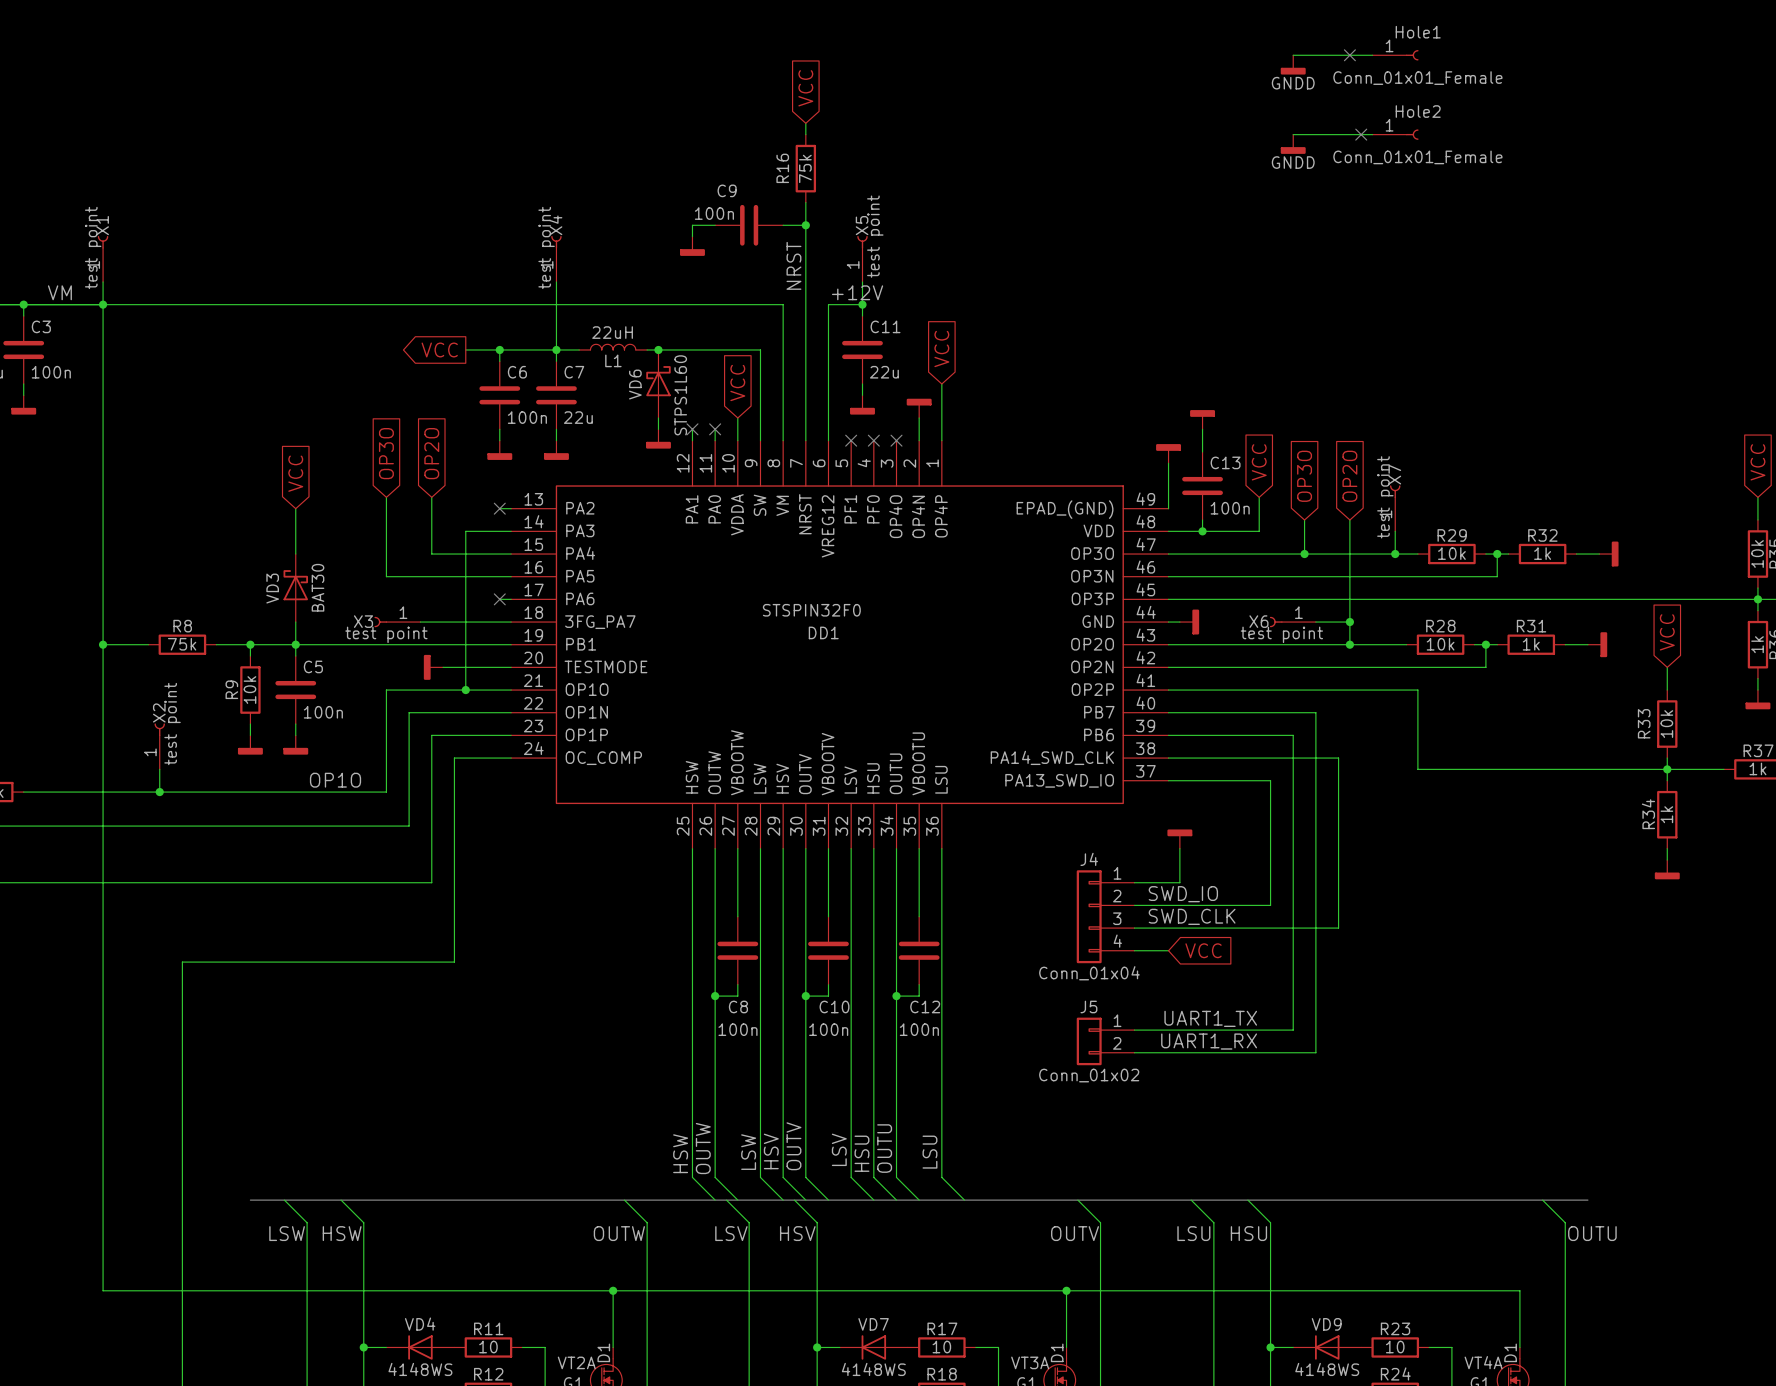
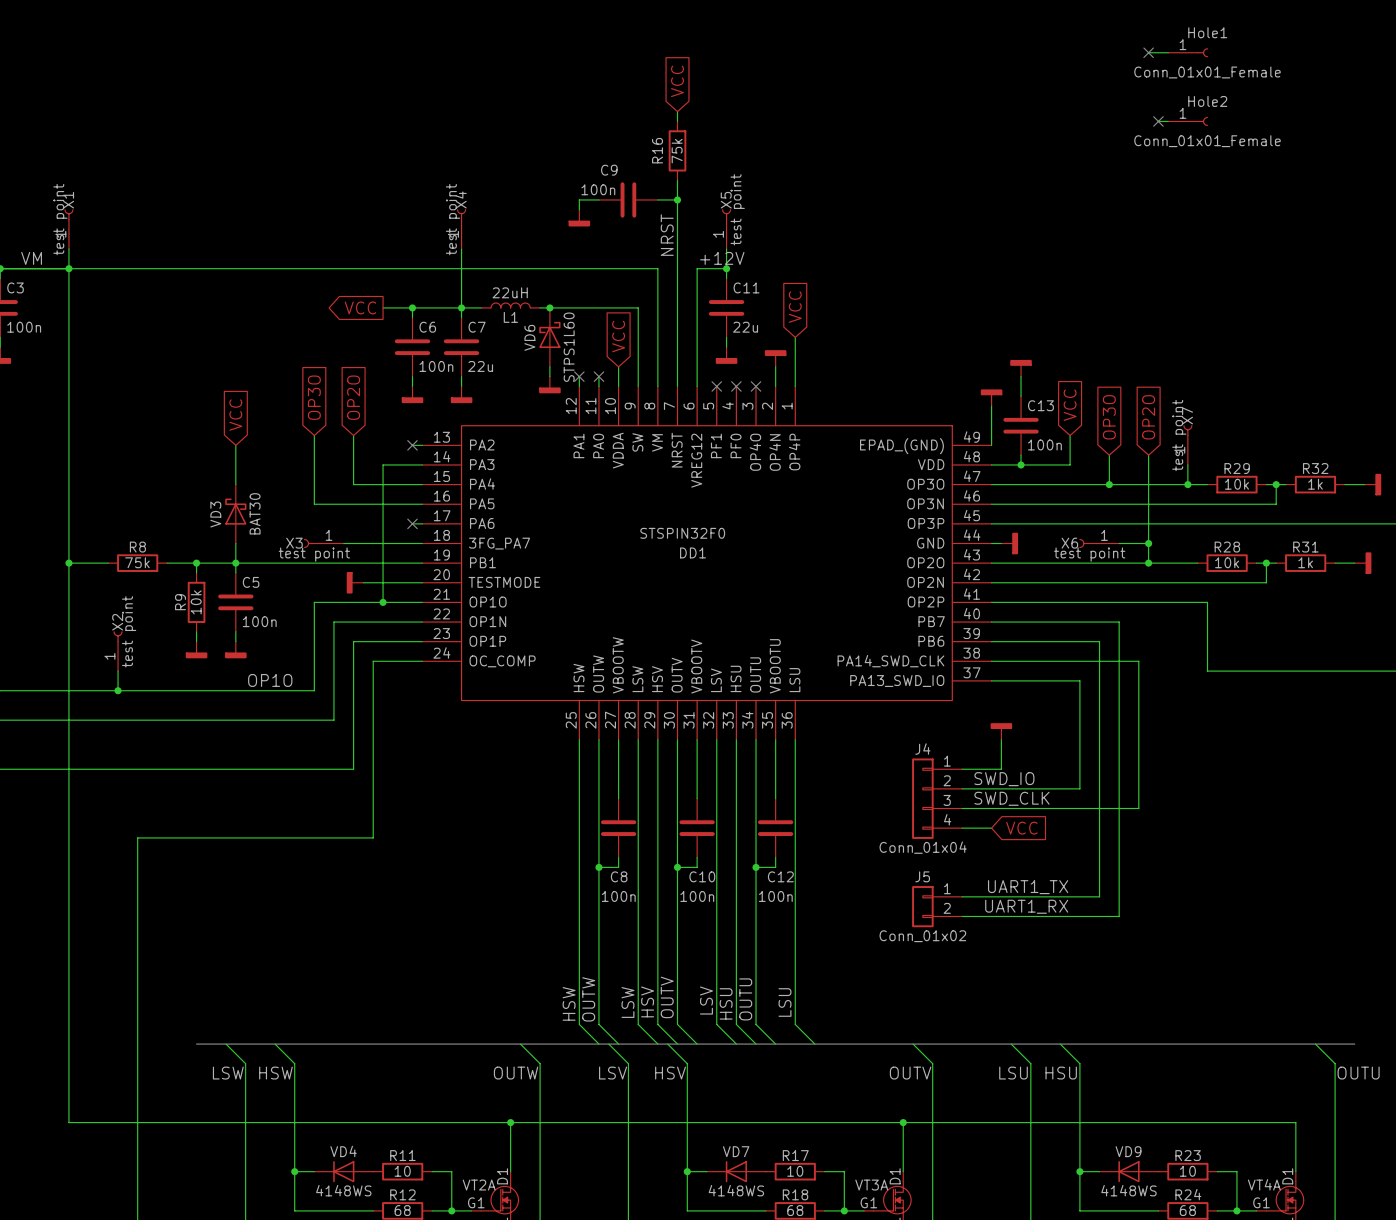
wire: (1293, 55) (1349, 55) -> none
power symbol: GNDD (1293, 64) -> none
wire: (1293, 134) (1361, 134) -> none
power symbol: GNDD (1293, 144) -> none

